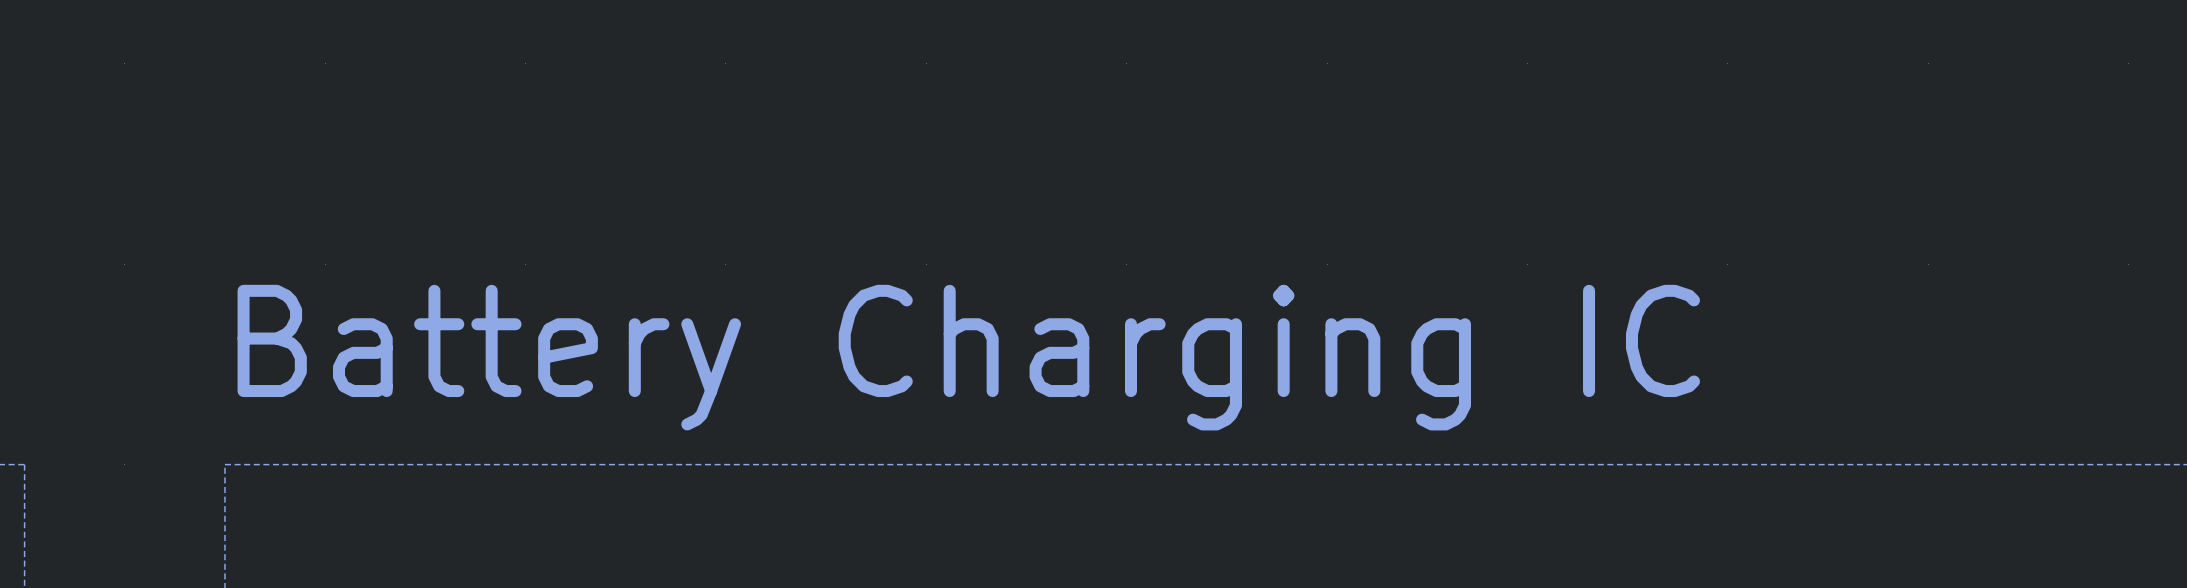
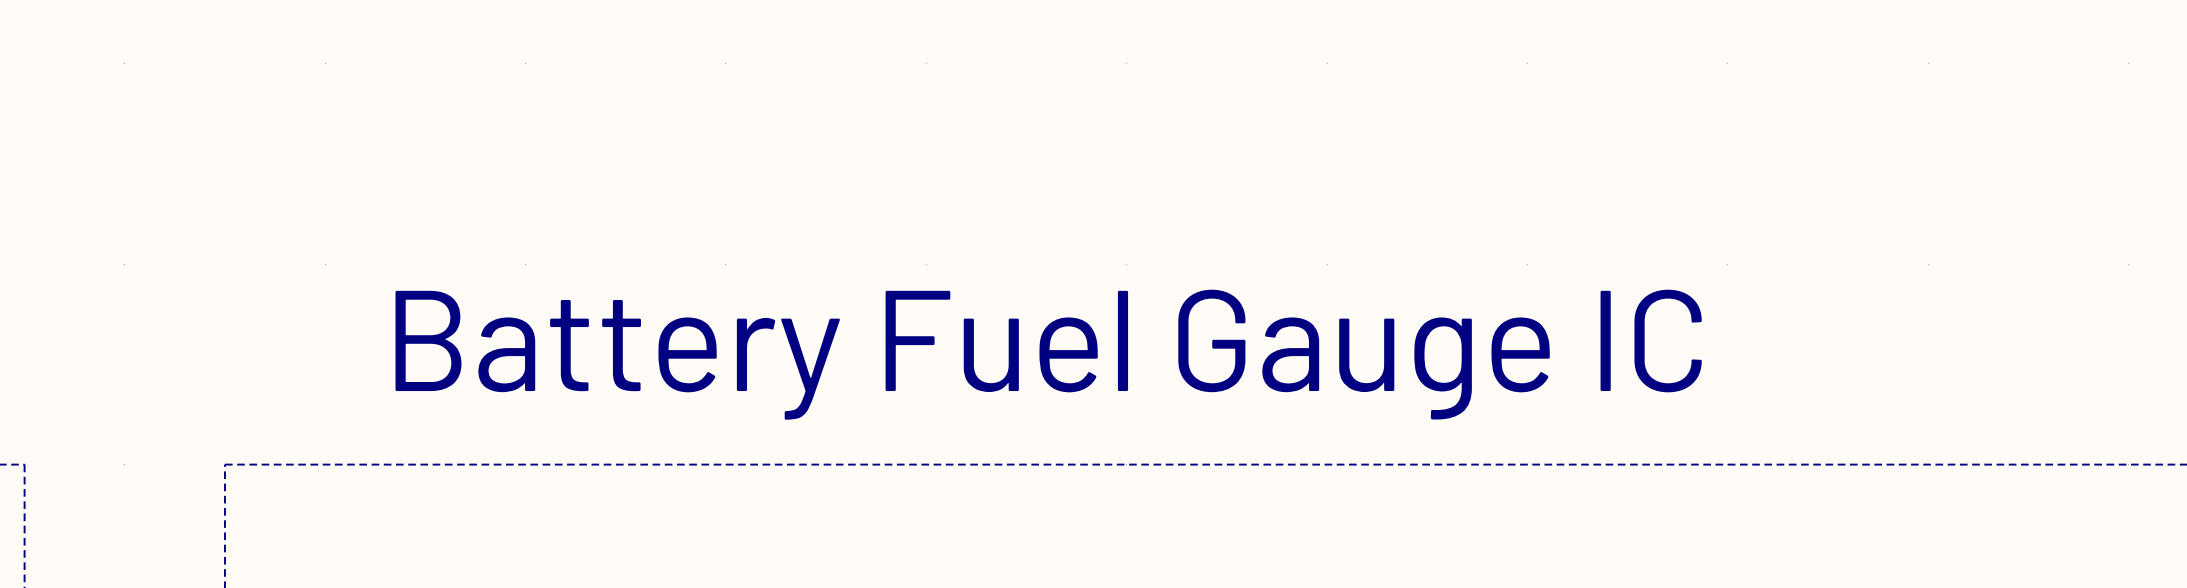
text: Battery Charging IC (968, 357) -> Battery Fuel Gauge IC (1048, 354)

